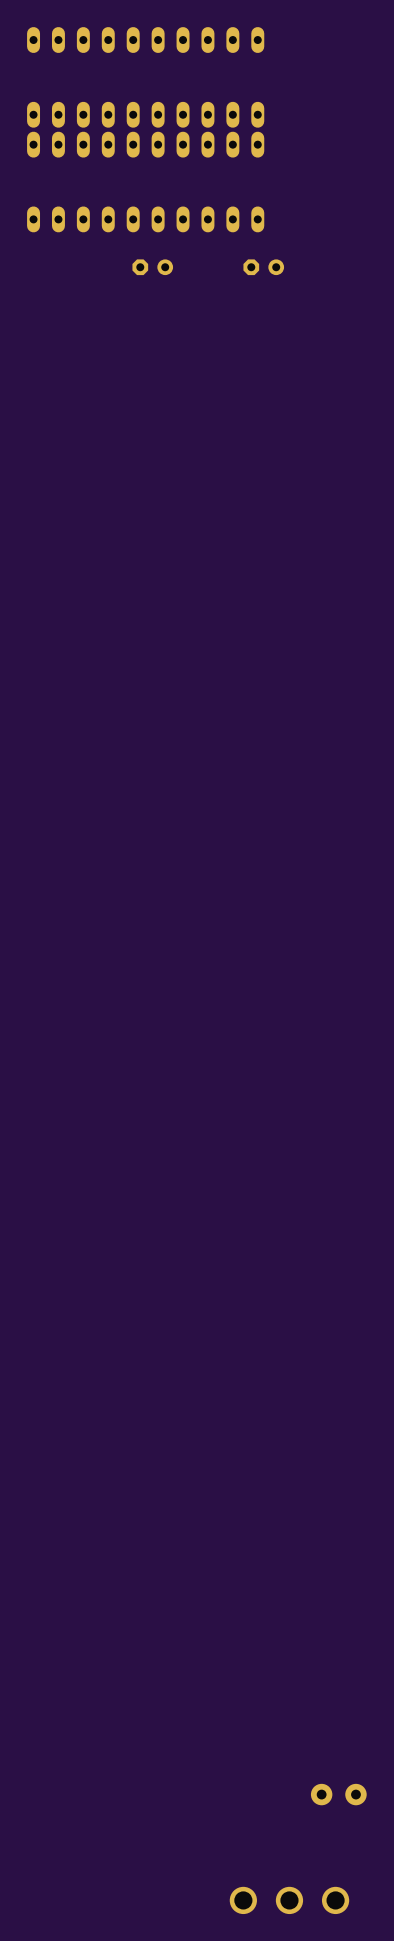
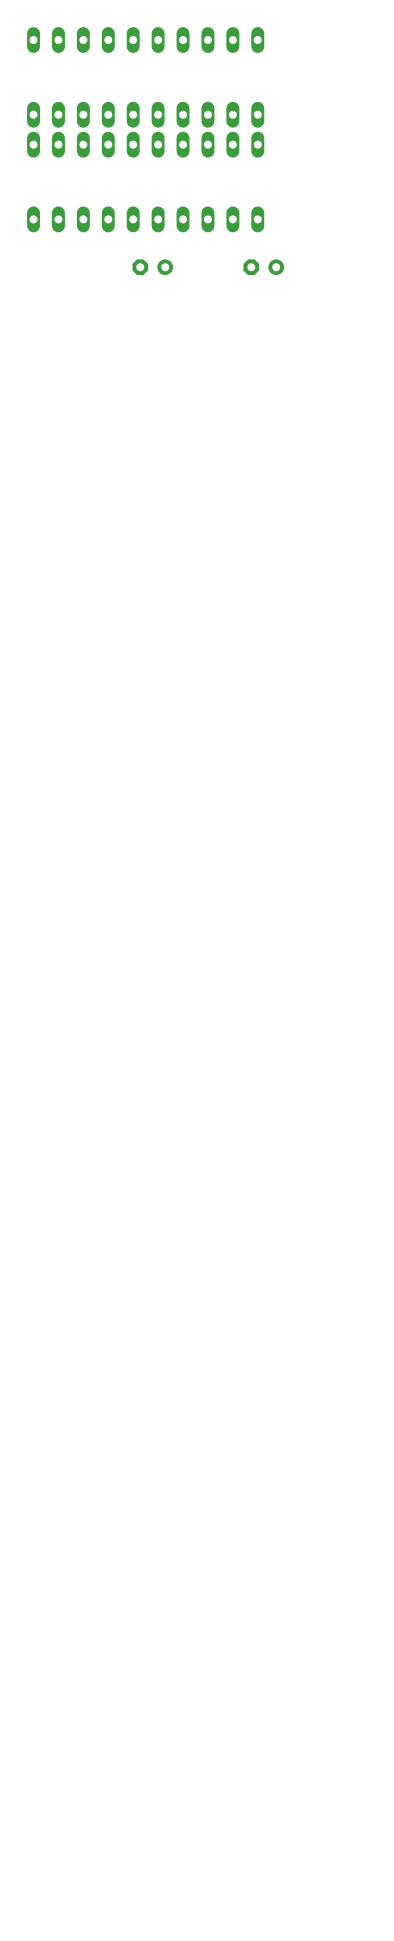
part: (338, 1794) -> none
part: (289, 1900) -> none

